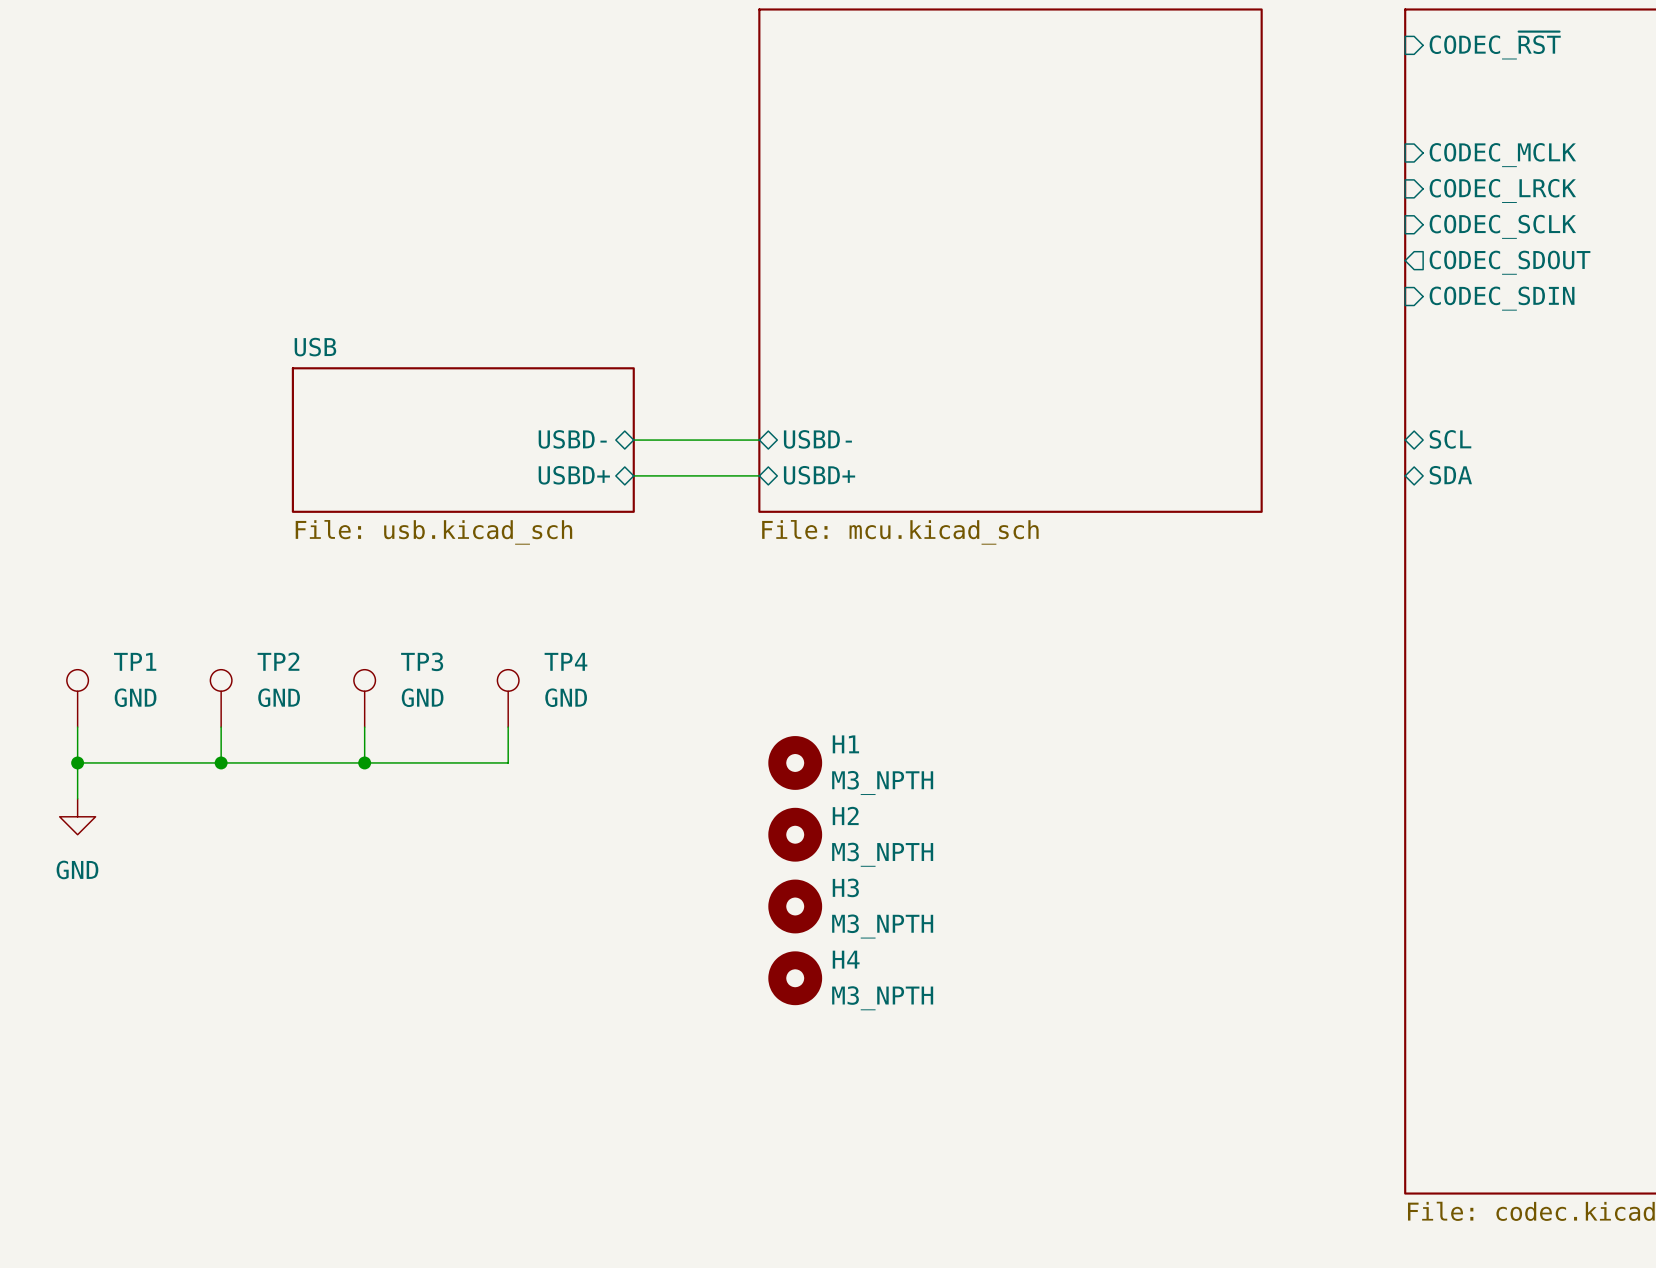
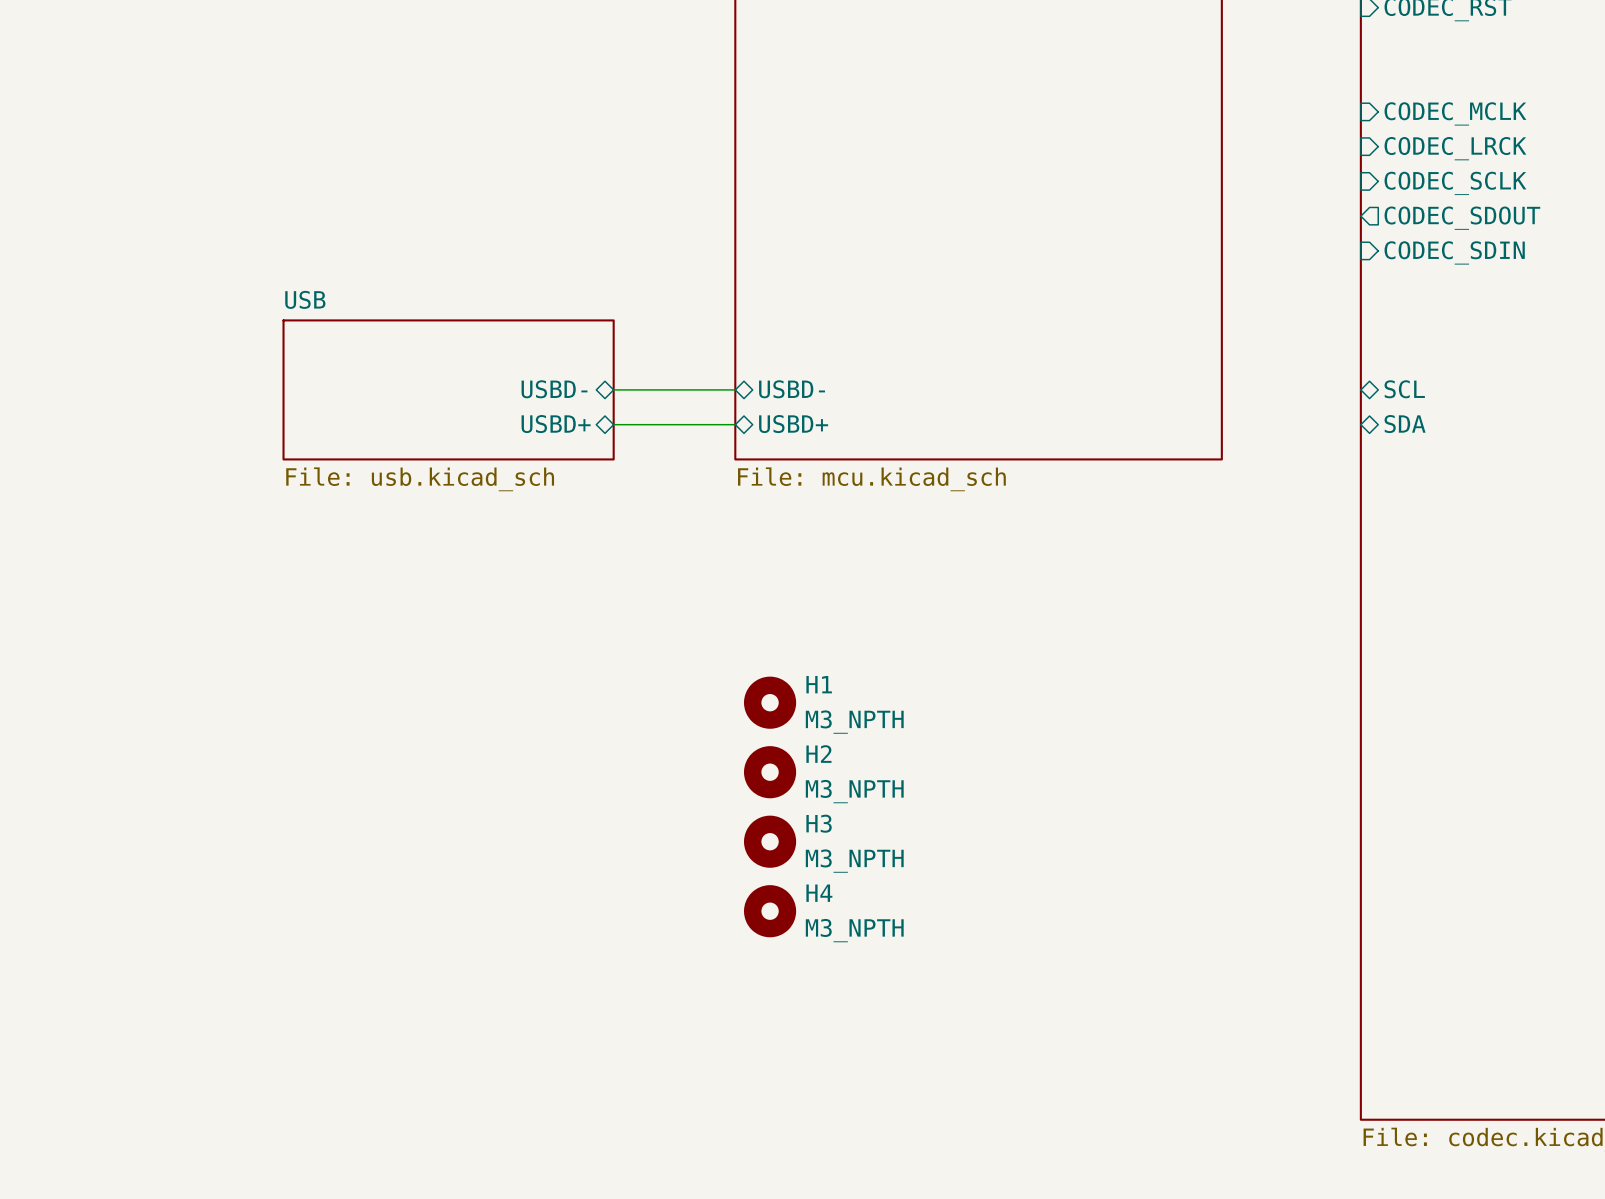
TP1: GND (77, 698) -> none
TP2: GND (221, 698) -> none
TP3: GND (364, 698) -> none
TP4: GND (508, 698) -> none
wire: (77, 727) (77, 798) -> none
wire: (221, 727) (221, 762) -> none
wire: (364, 727) (364, 762) -> none
wire: (508, 727) (508, 762) (77, 762) -> none
junction: (77, 762) -> none
junction: (221, 762) -> none
junction: (364, 762) -> none
power symbol: GND (77, 816) -> none

